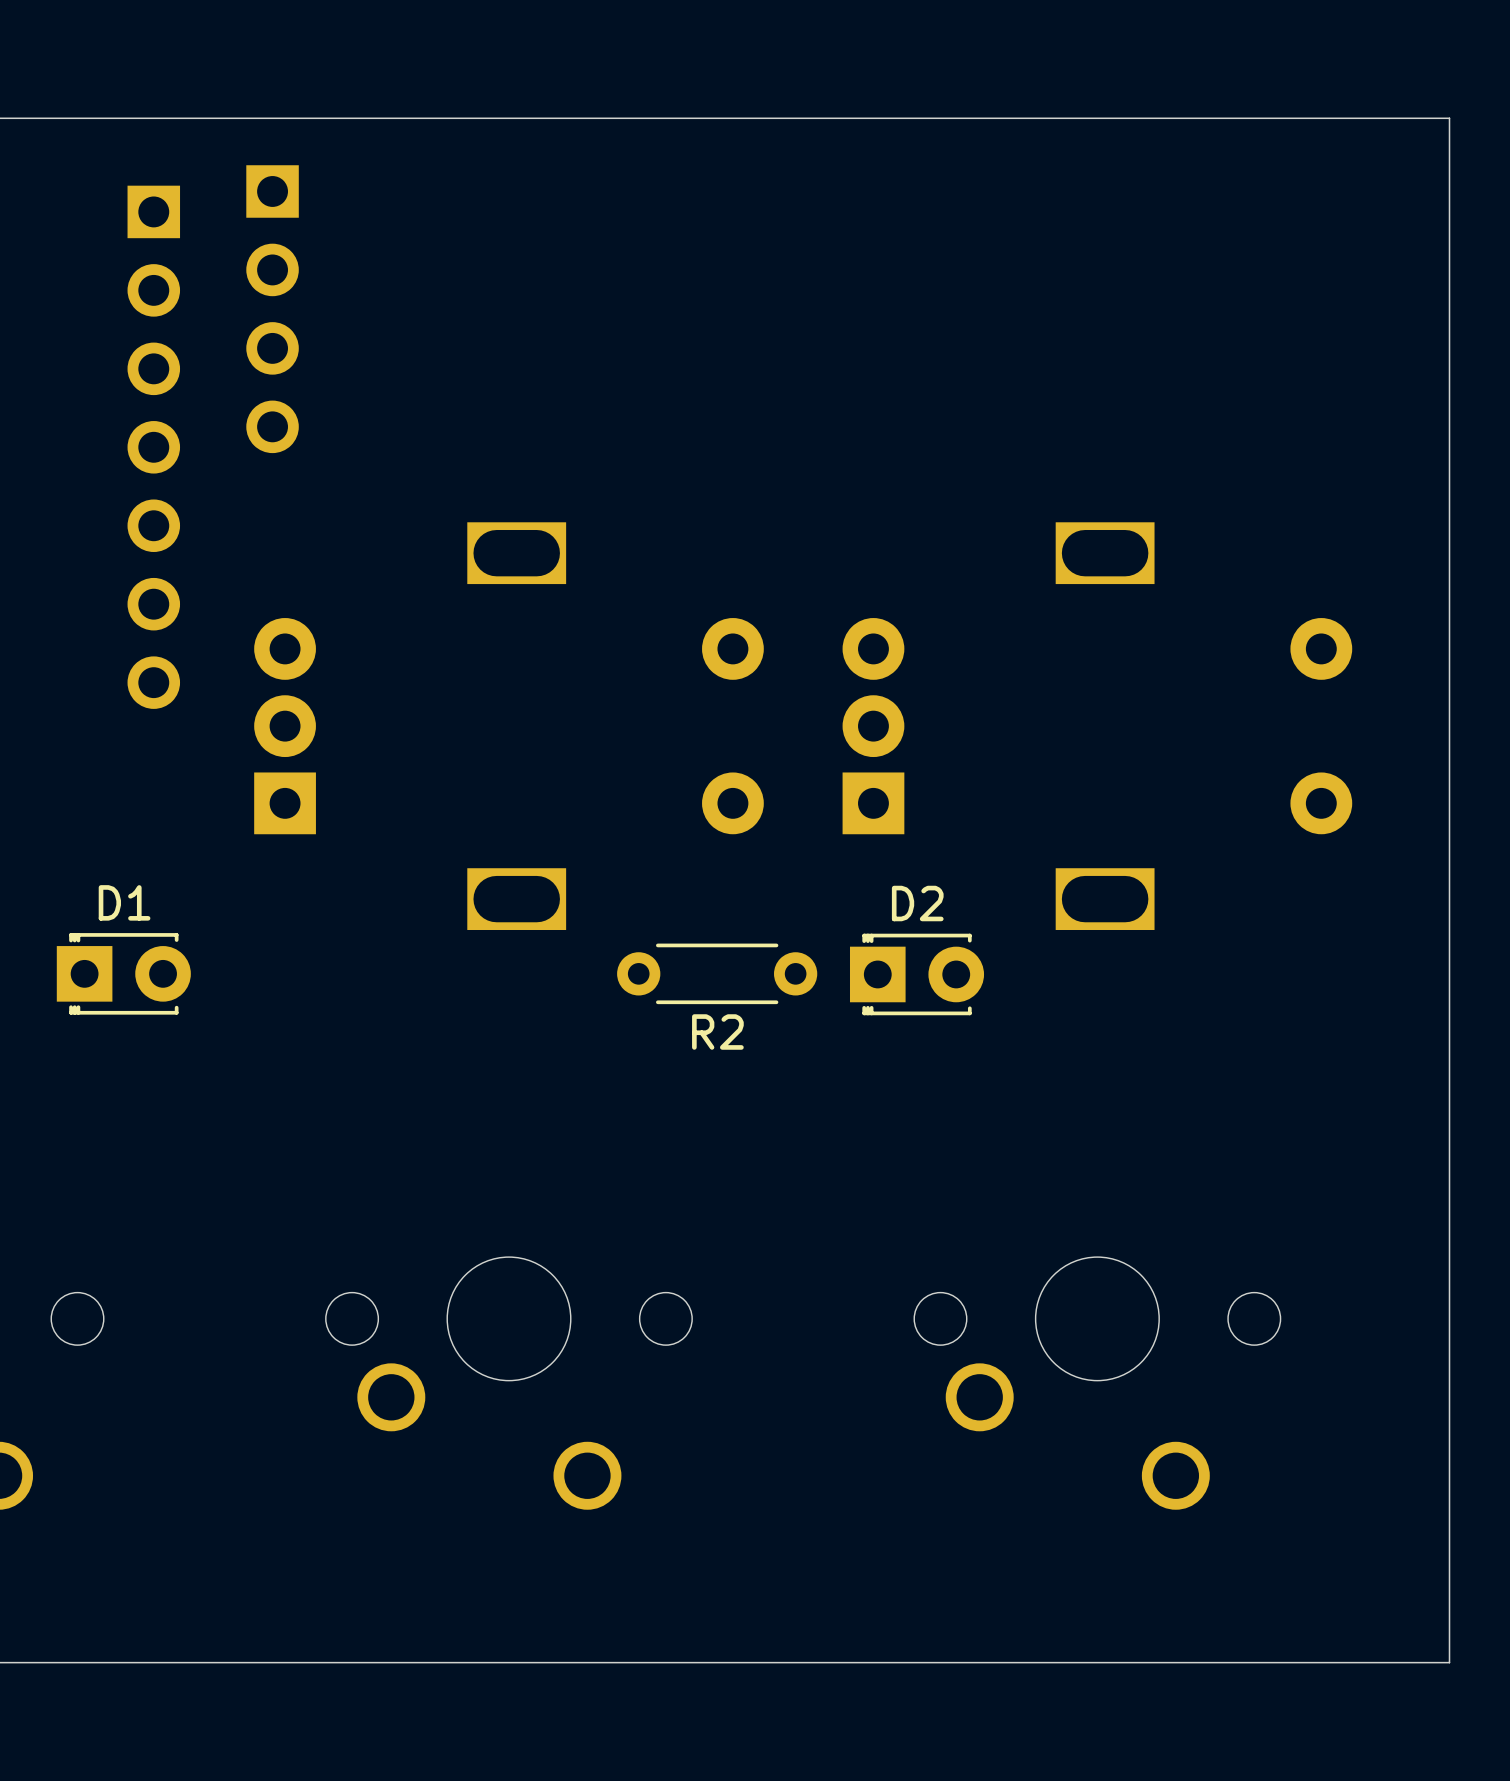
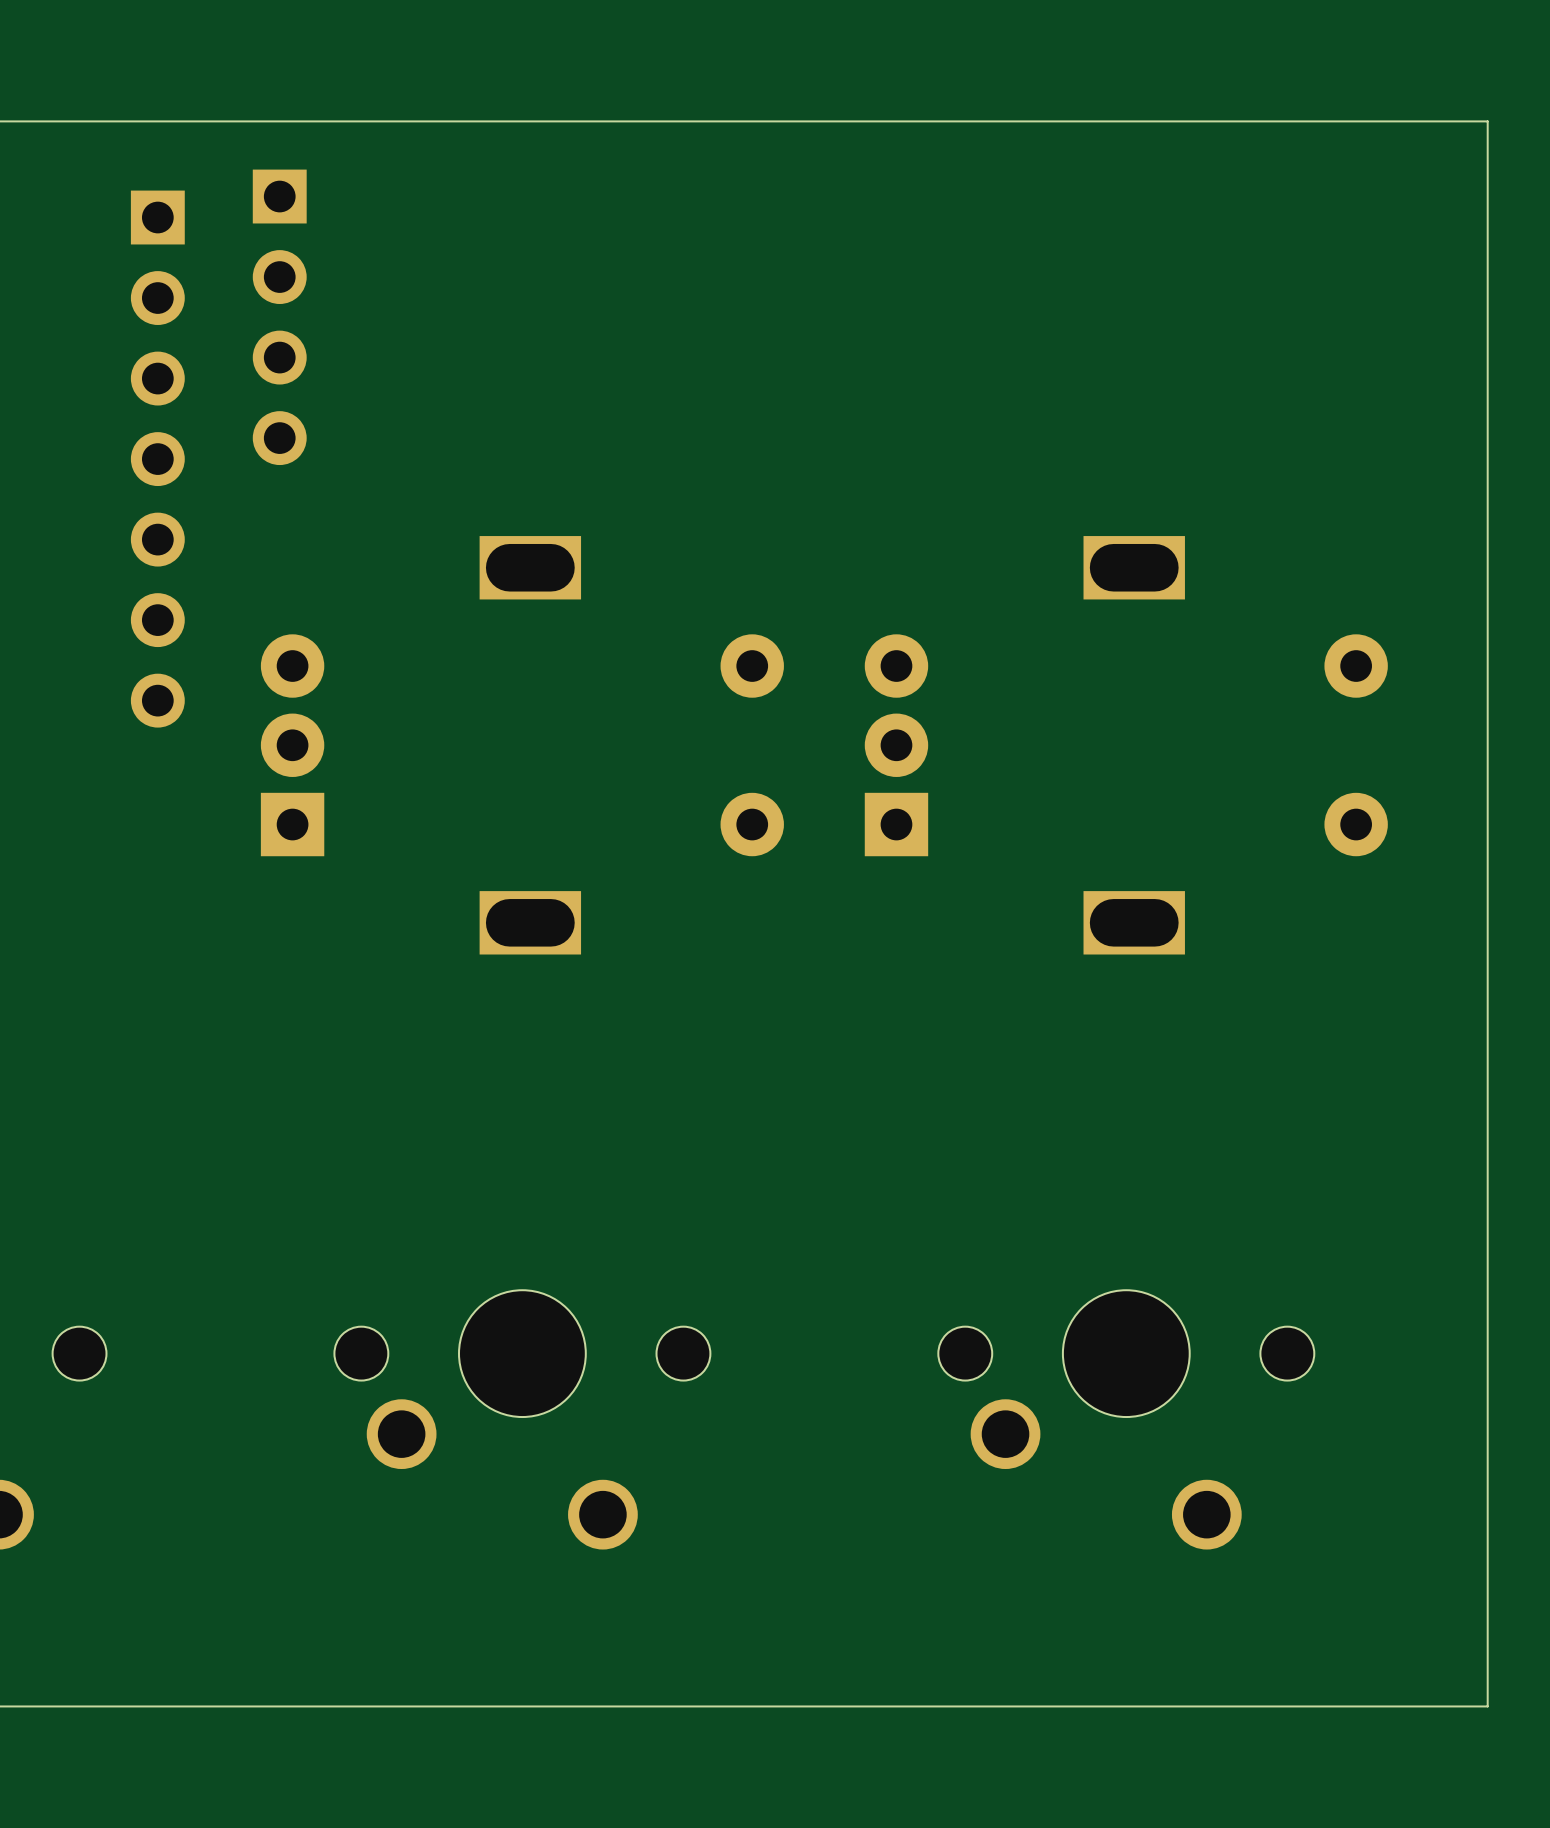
D1: (123, 973) -> none
R2: (717, 973) -> none
D2: (917, 974) -> none

